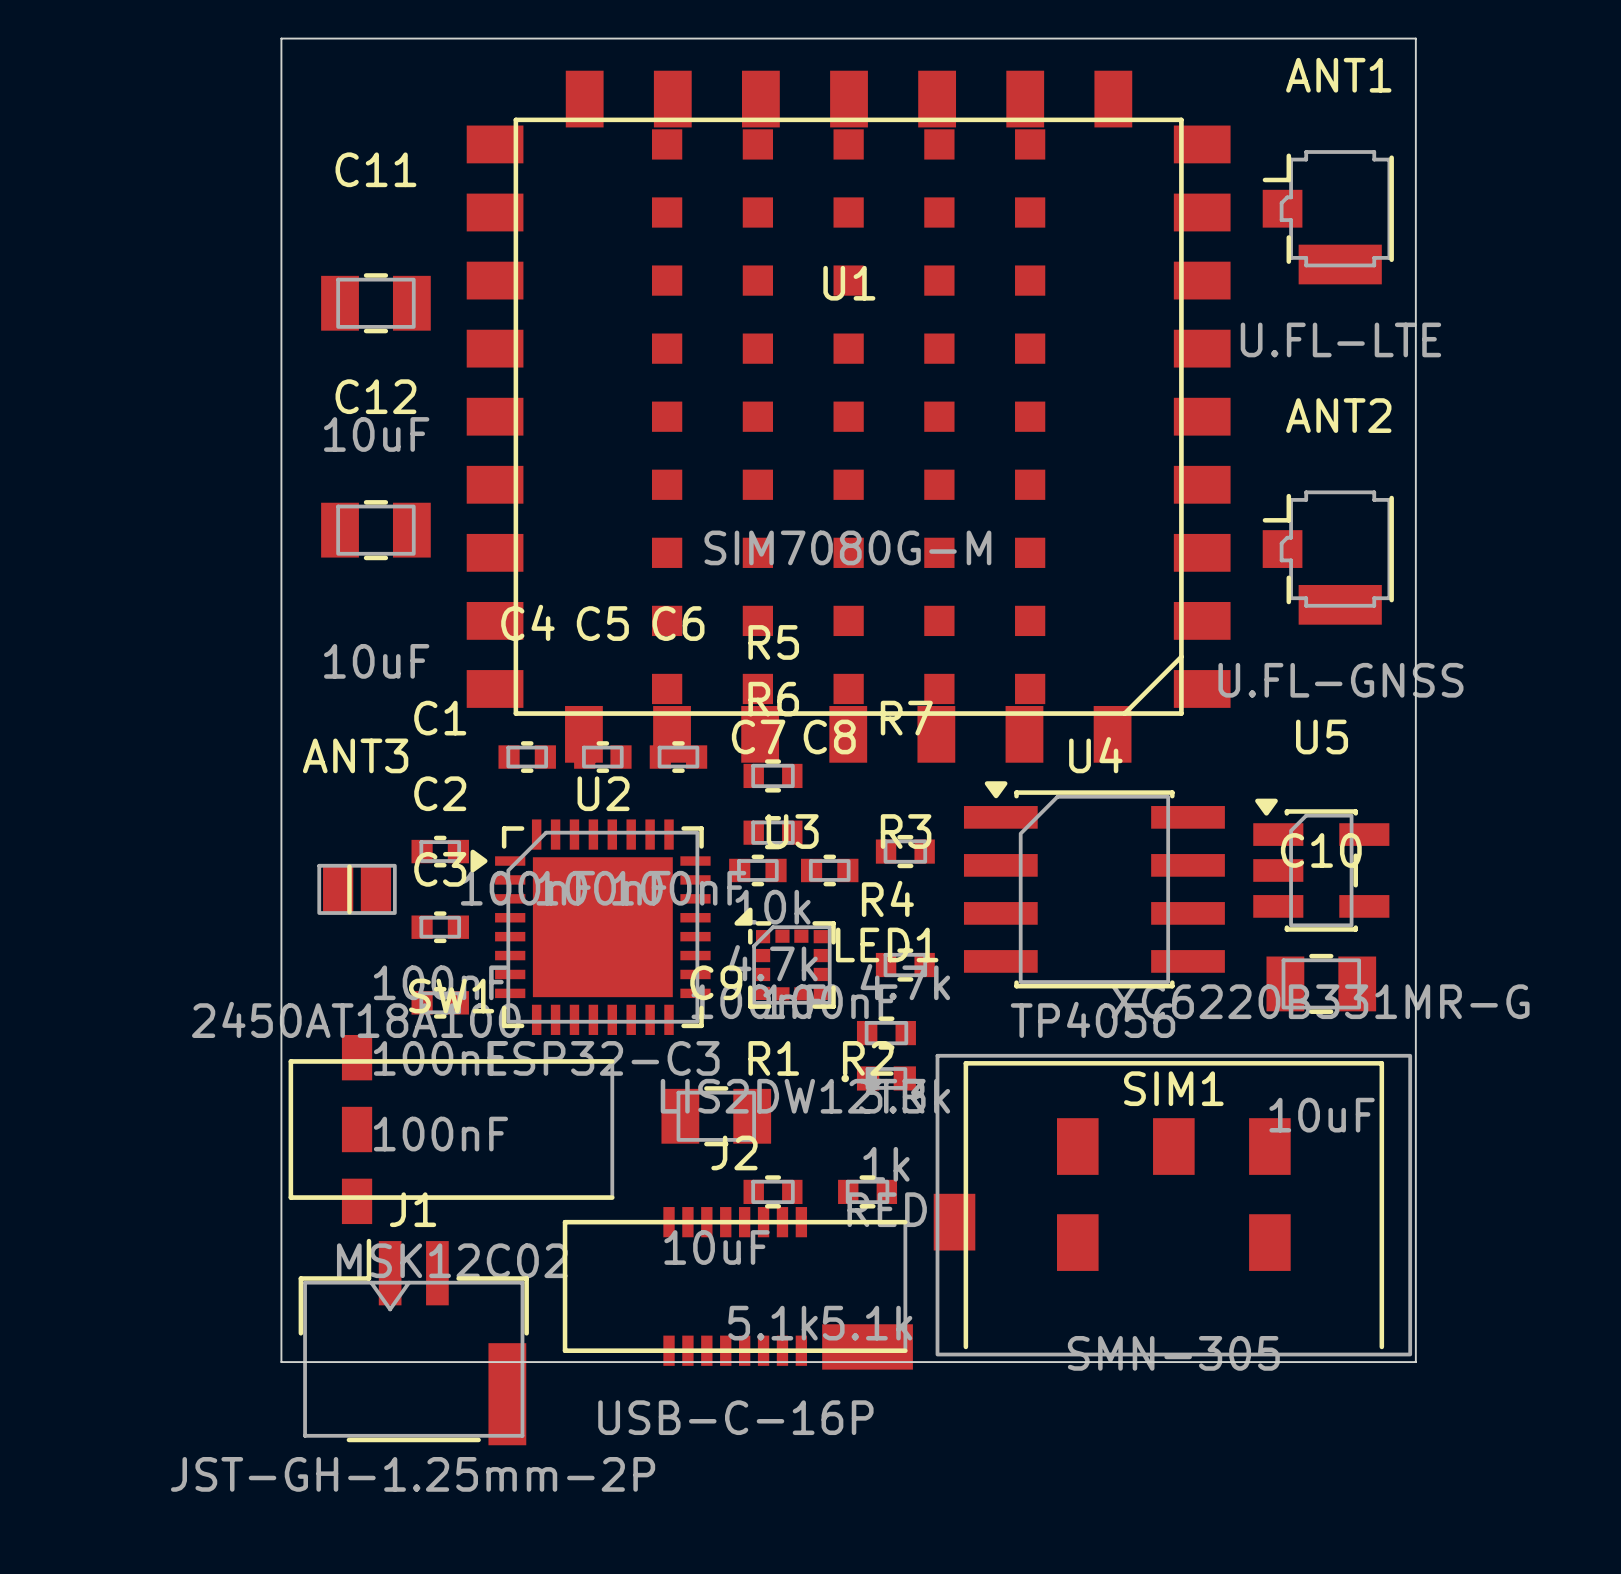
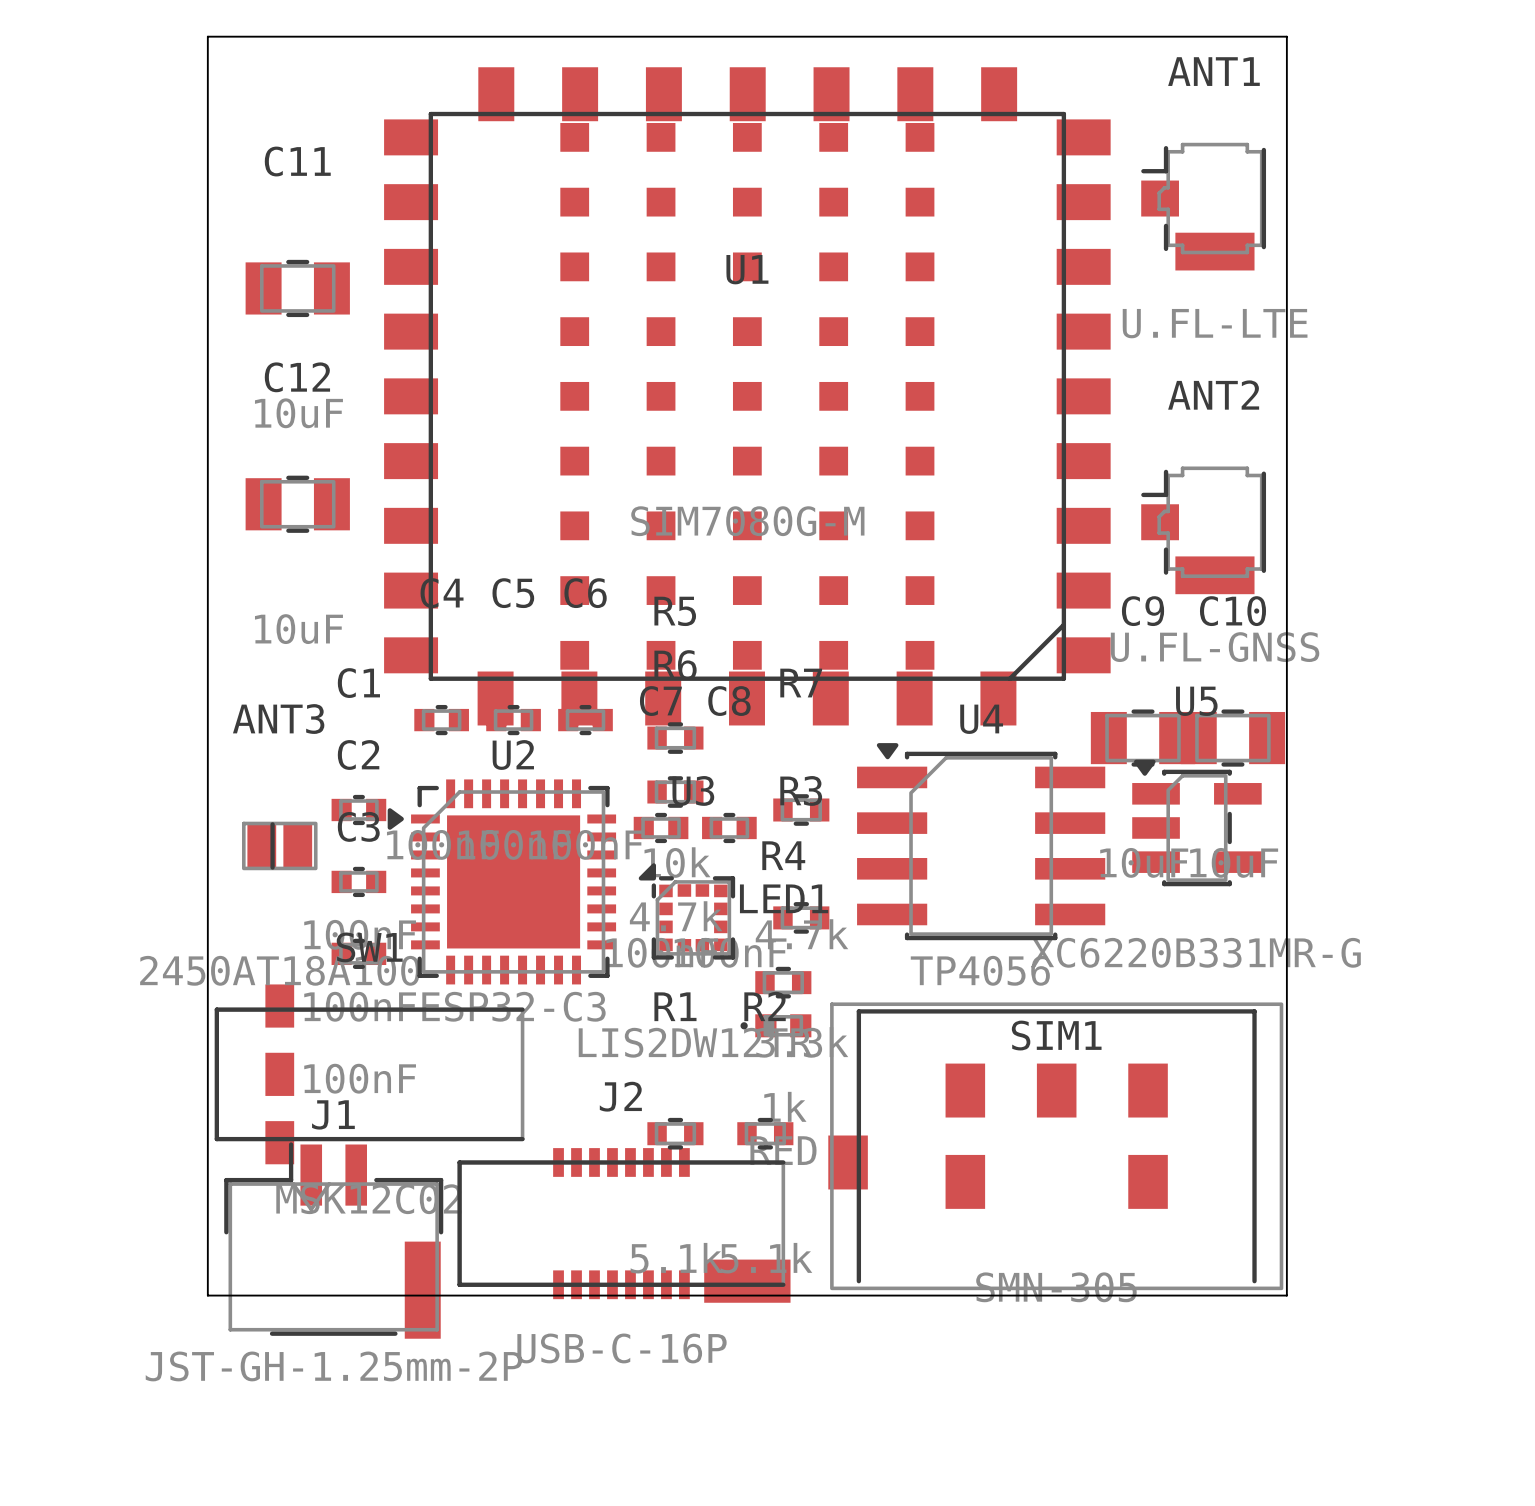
C10 position: (1321, 983) -> (1232, 738)
C9 position: (716, 1116) -> (1143, 738)
J2 position: (737, 1288) -> (623, 1225)
J1 position: (413, 1342) -> (333, 1240)

